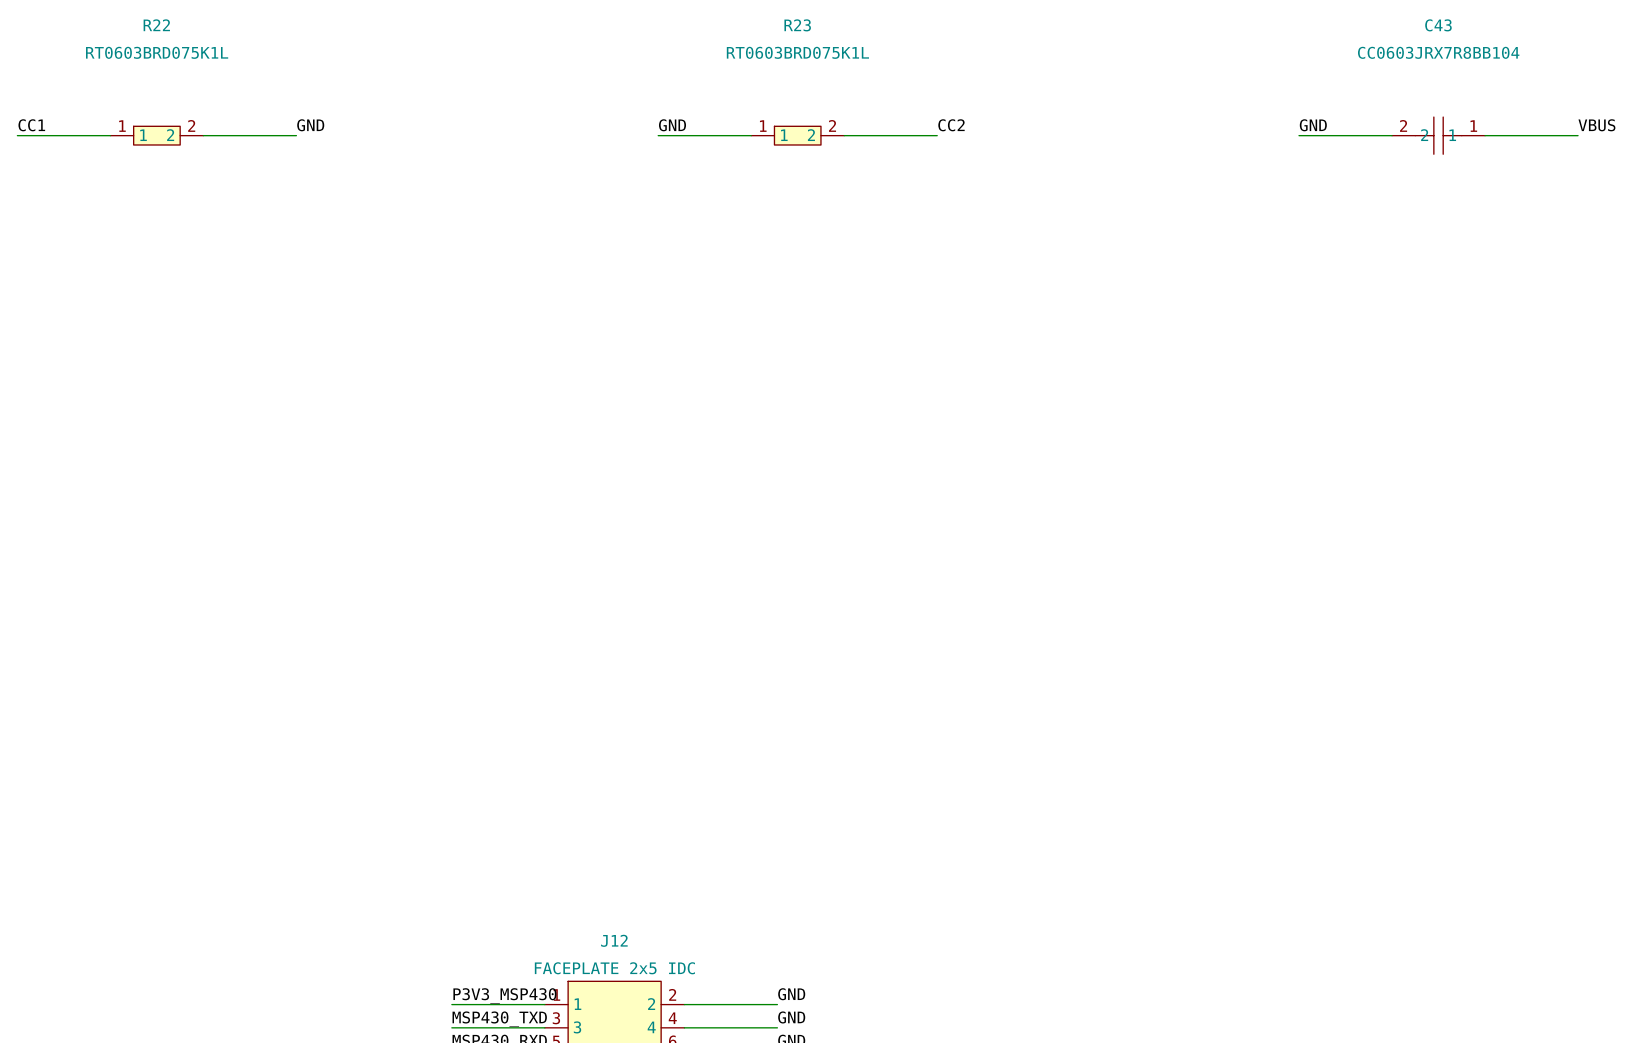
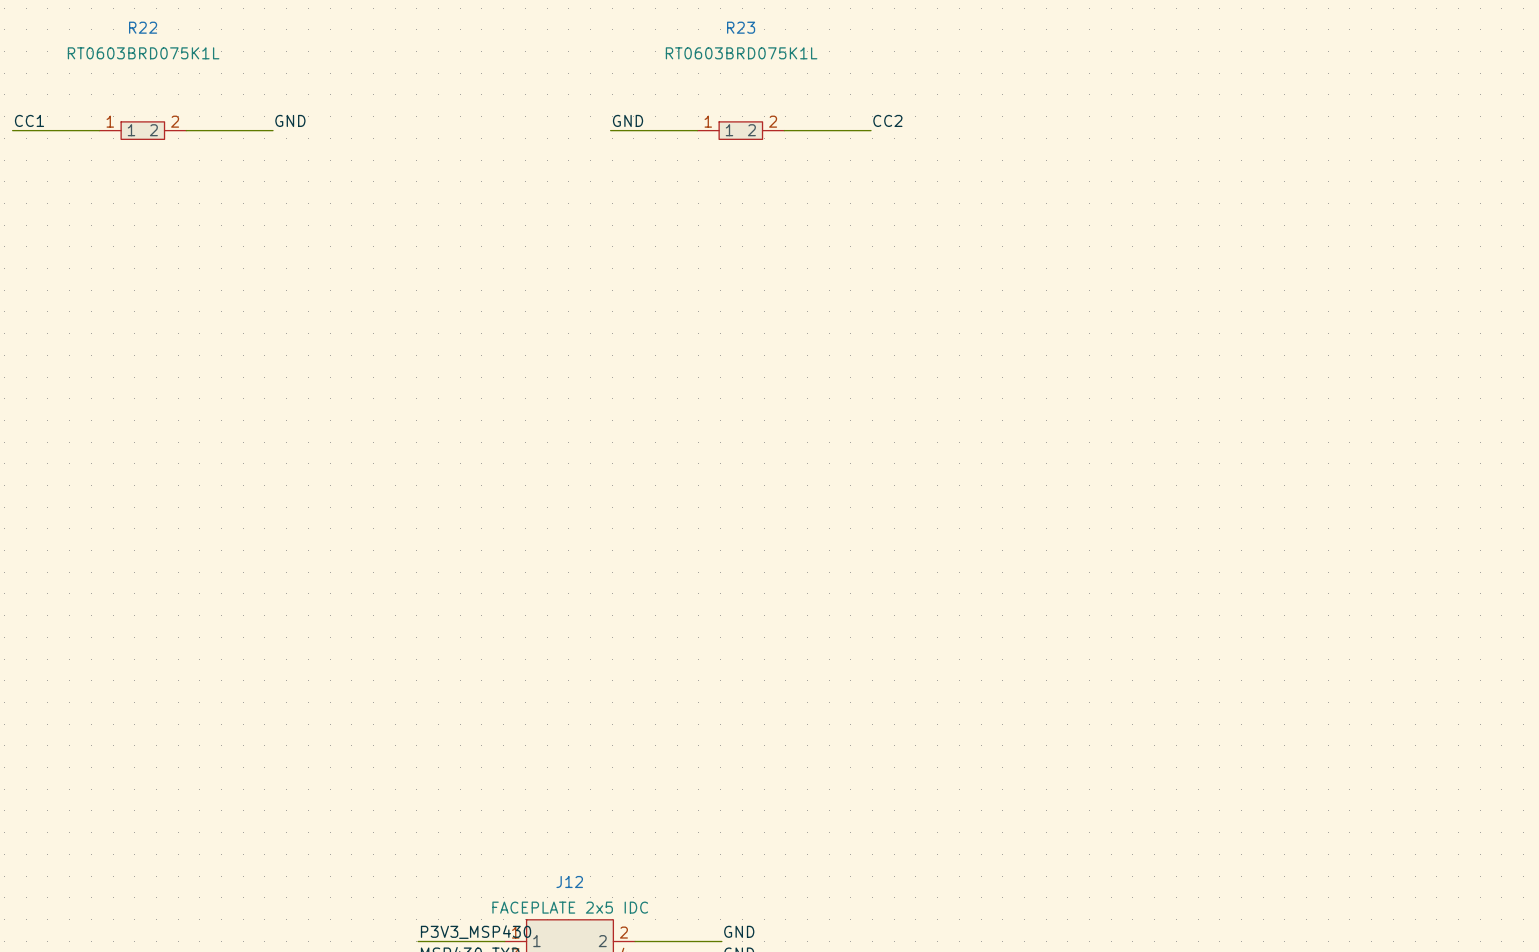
label: GND (1313, 125) -> none
label: VBUS (1596, 125) -> none
wire: (1299, 135) (1392, 135) -> none
C43: CC0603JRX7R8BB104 (1438, 135) -> none
wire: (1485, 135) (1578, 135) -> none

